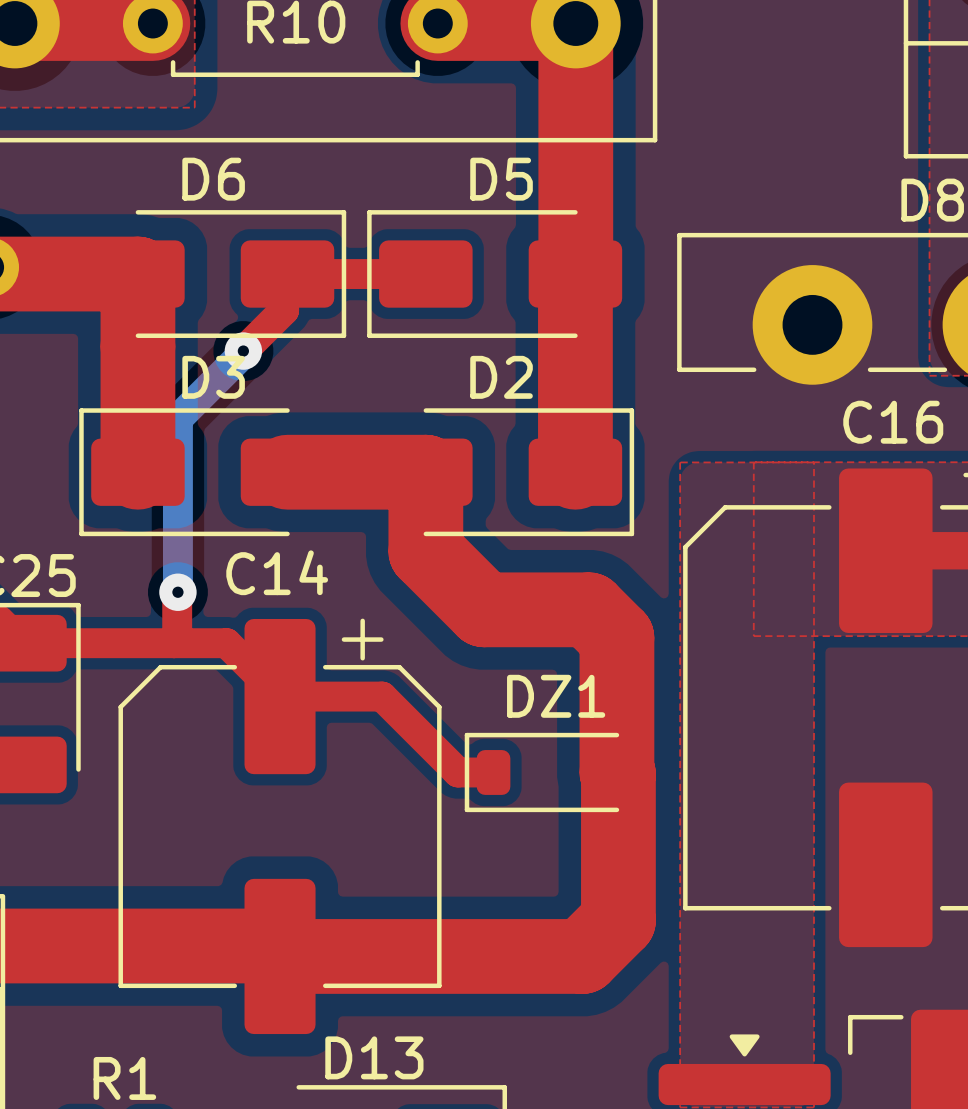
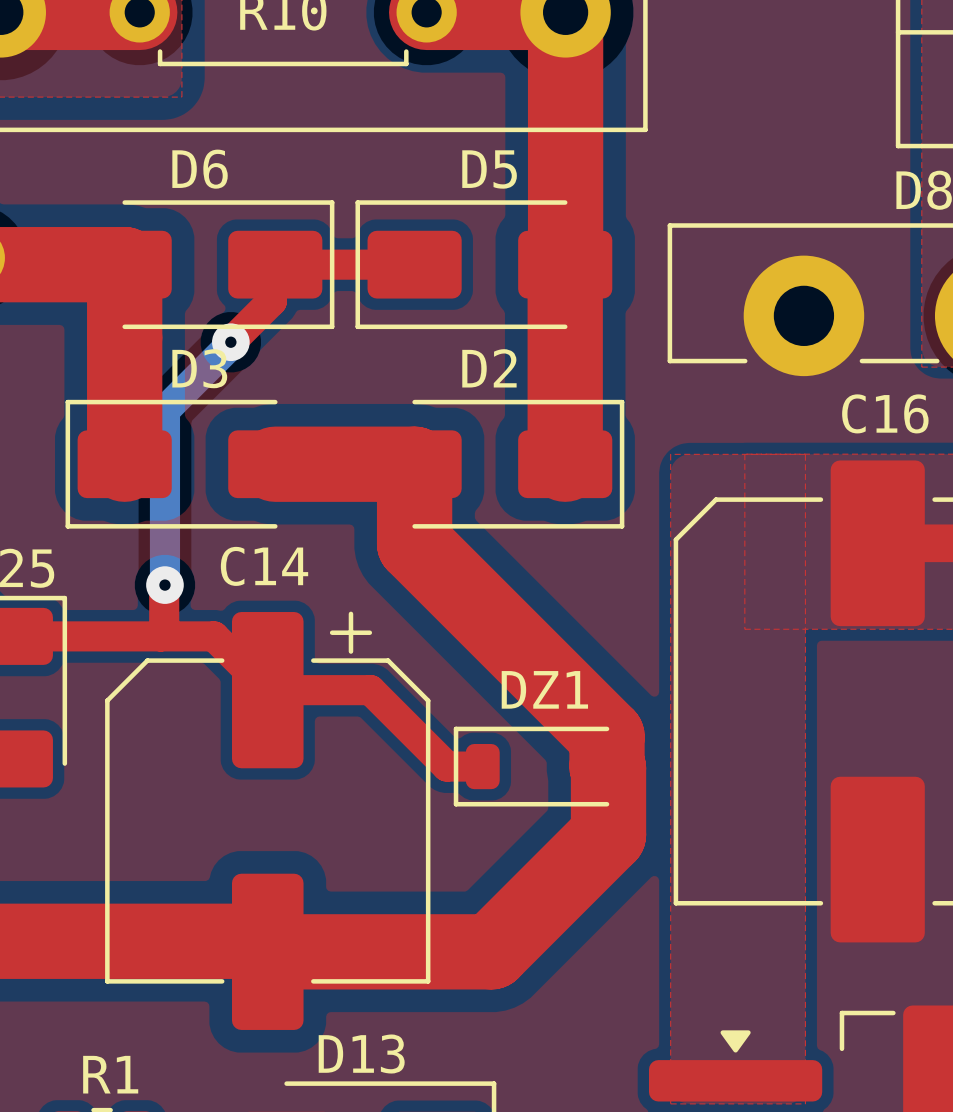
top track: (484, 609) (588, 609) (616, 637) (616, 742) -> (473, 602) (607, 736)
top track: (618, 840) (618, 920) (582, 956) (502, 956) -> (608, 834) (491, 951)

